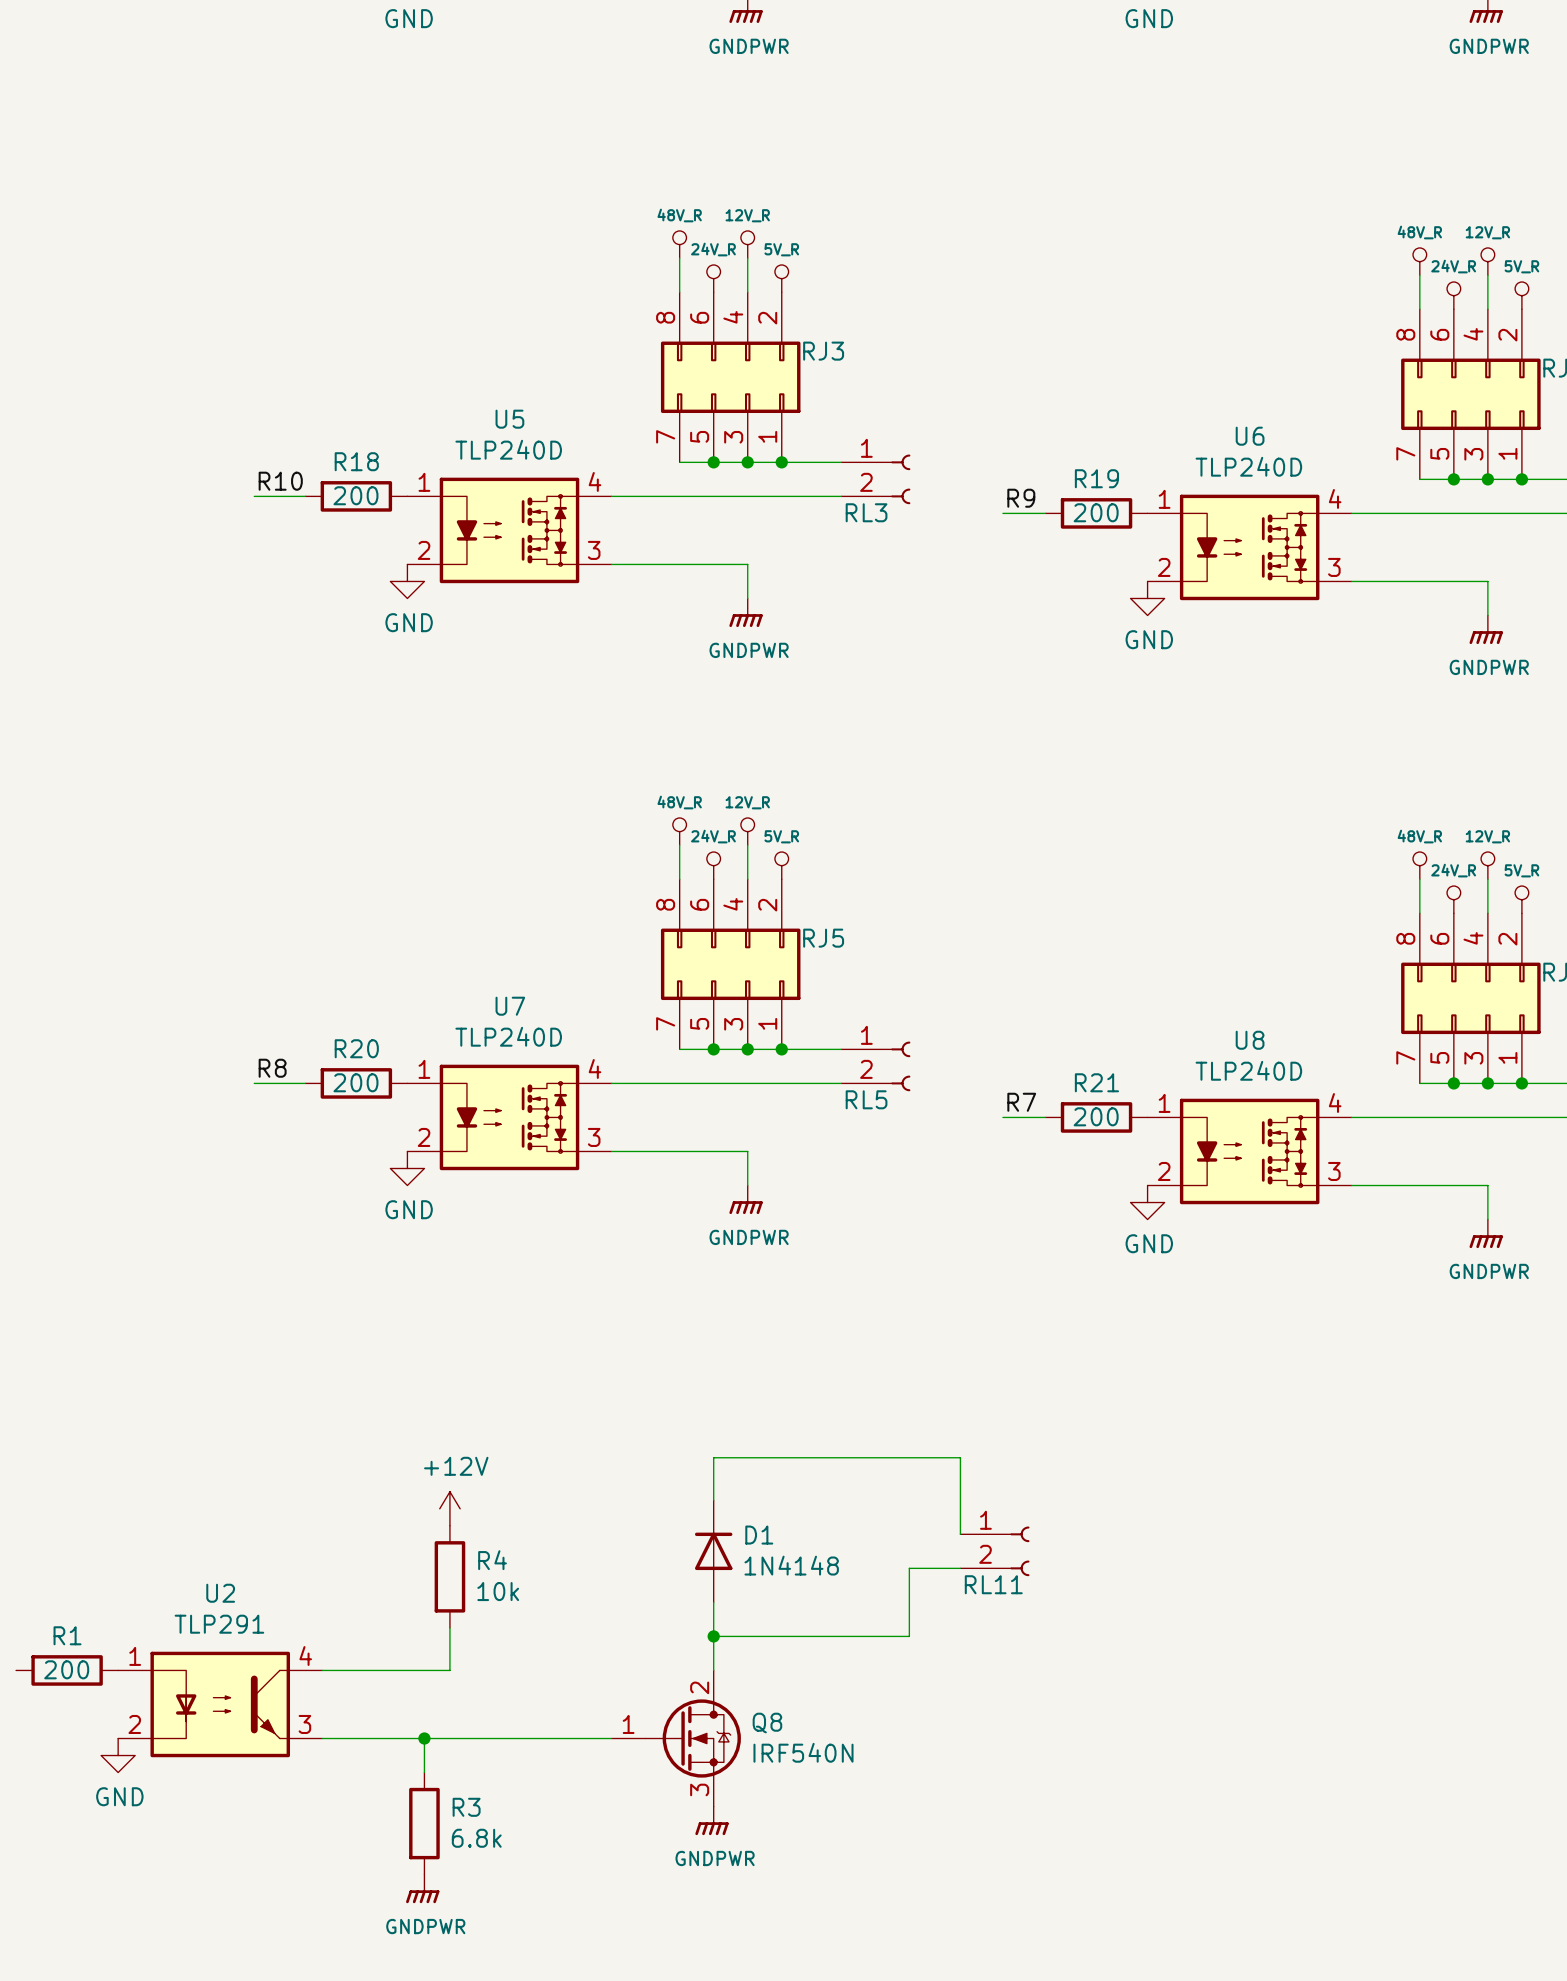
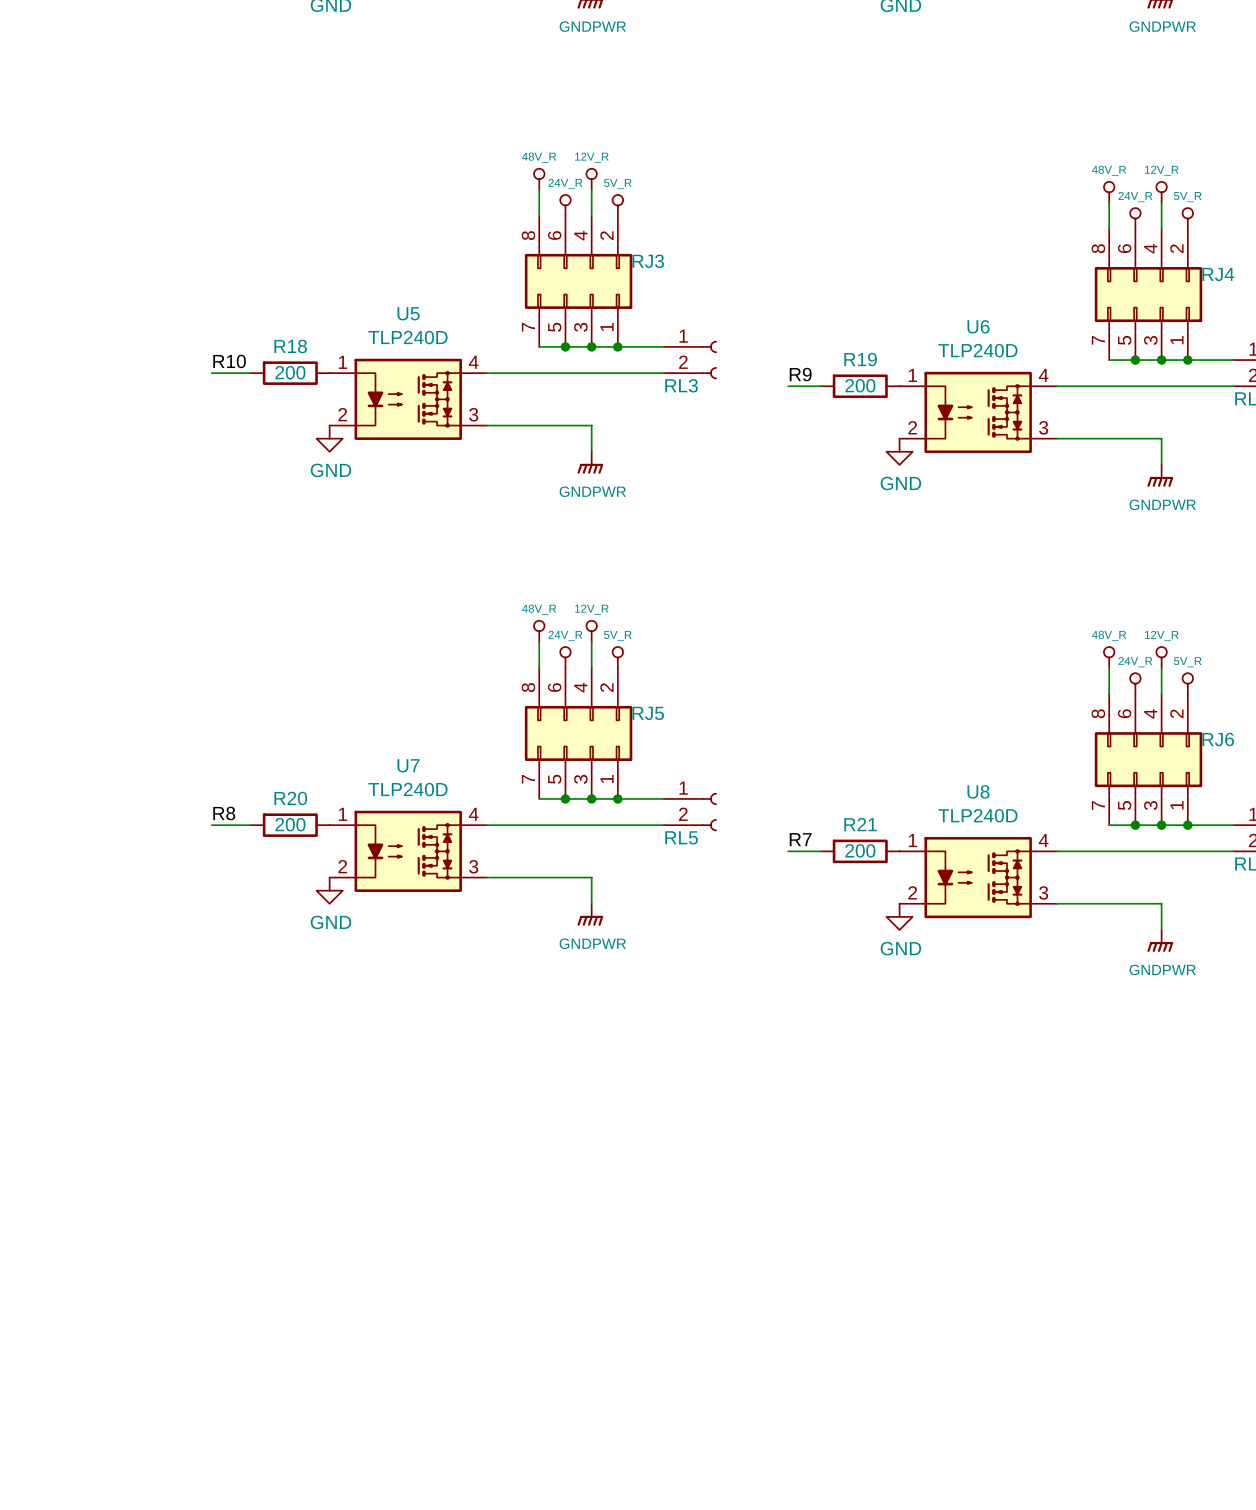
wire: (713, 1500) (713, 1457) (960, 1457) (960, 1534) -> none
power symbol: +12V (449, 1508) -> none
D1: 1N4148 (713, 1551) -> none
RL11: (994, 1551) -> none
wire: (960, 1568) (909, 1568) (909, 1636) (713, 1636) -> none
R4: 10k (449, 1576) -> none
wire: (713, 1602) (713, 1670) -> none
wire: (449, 1627) (449, 1670) (322, 1670) -> none
junction: (713, 1636) -> none
R1: 200 (67, 1670) -> none
U2: TLP291 (220, 1704) -> none
wire: (322, 1738) (611, 1738) -> none
wire: (424, 1738) (424, 1772) -> none
junction: (424, 1738) -> none
Q8: IRF540N (676, 1738) -> none
power symbol: GND (118, 1755) -> none
power symbol: GNDPWR (711, 1820) -> none
R3: 6.8k (424, 1823) -> none
power symbol: GNDPWR (422, 1888) -> none

